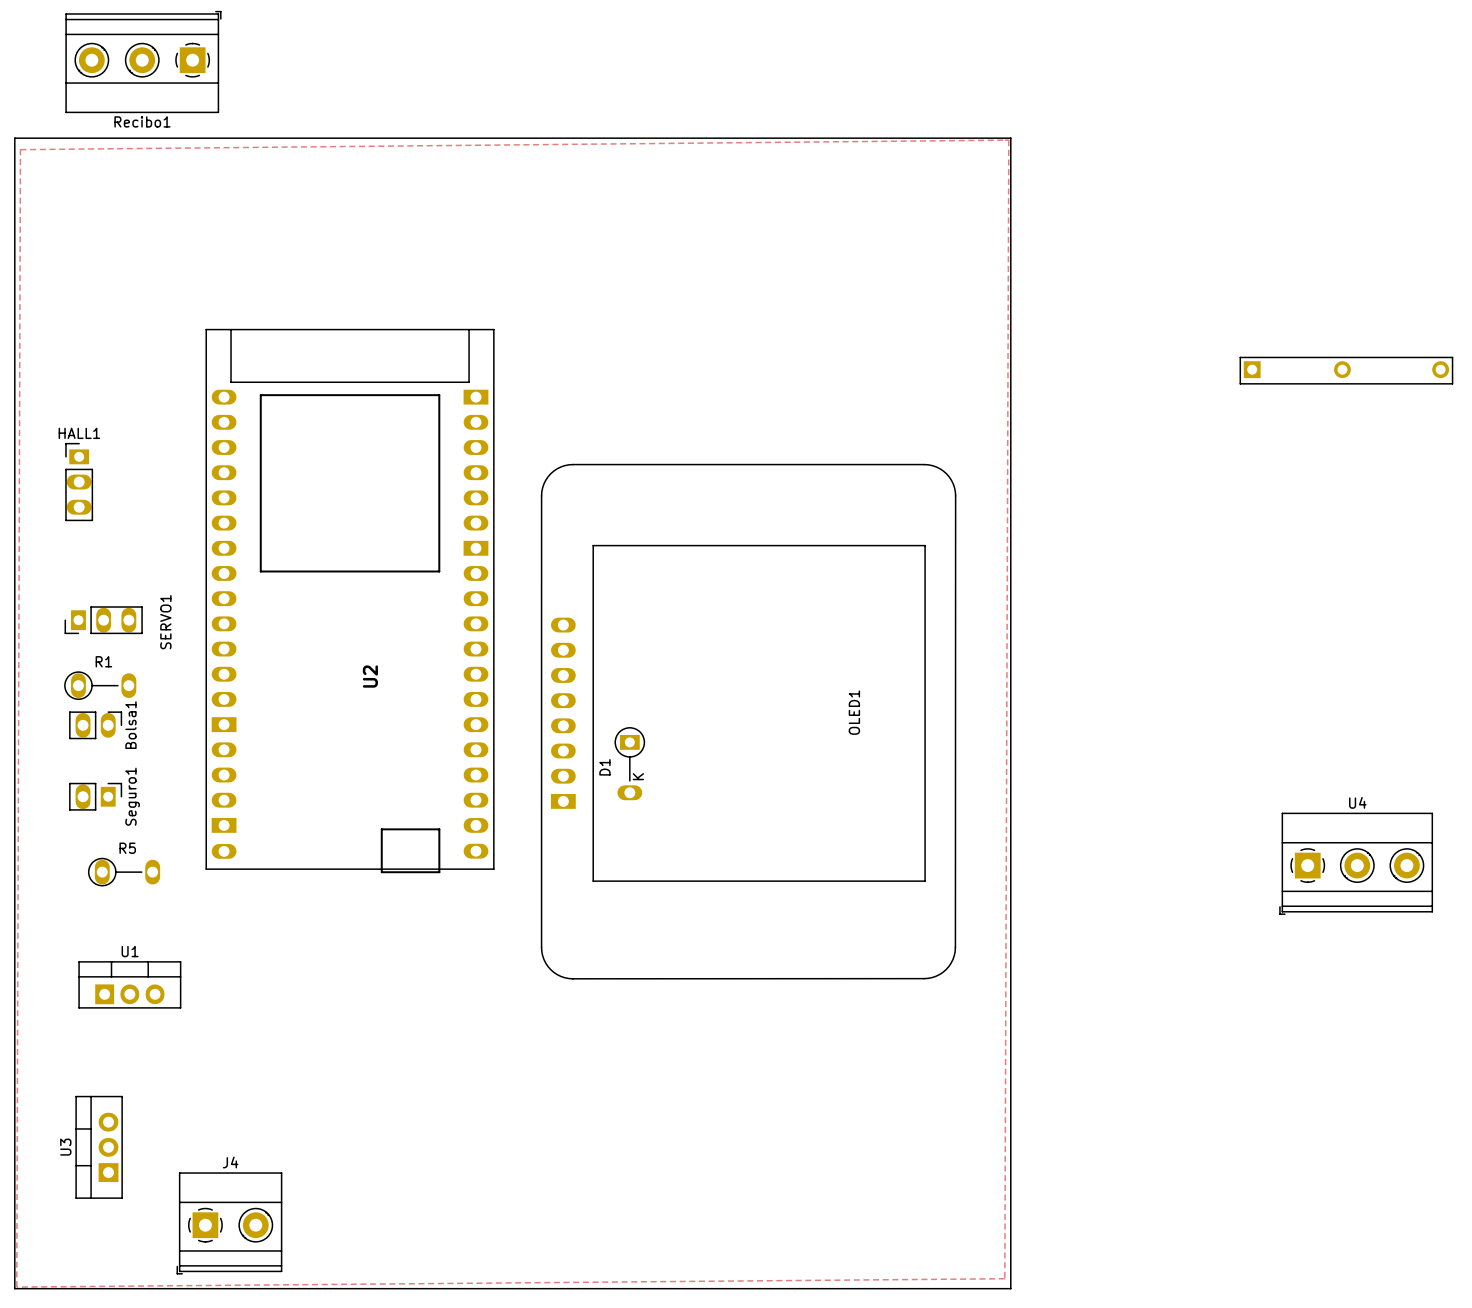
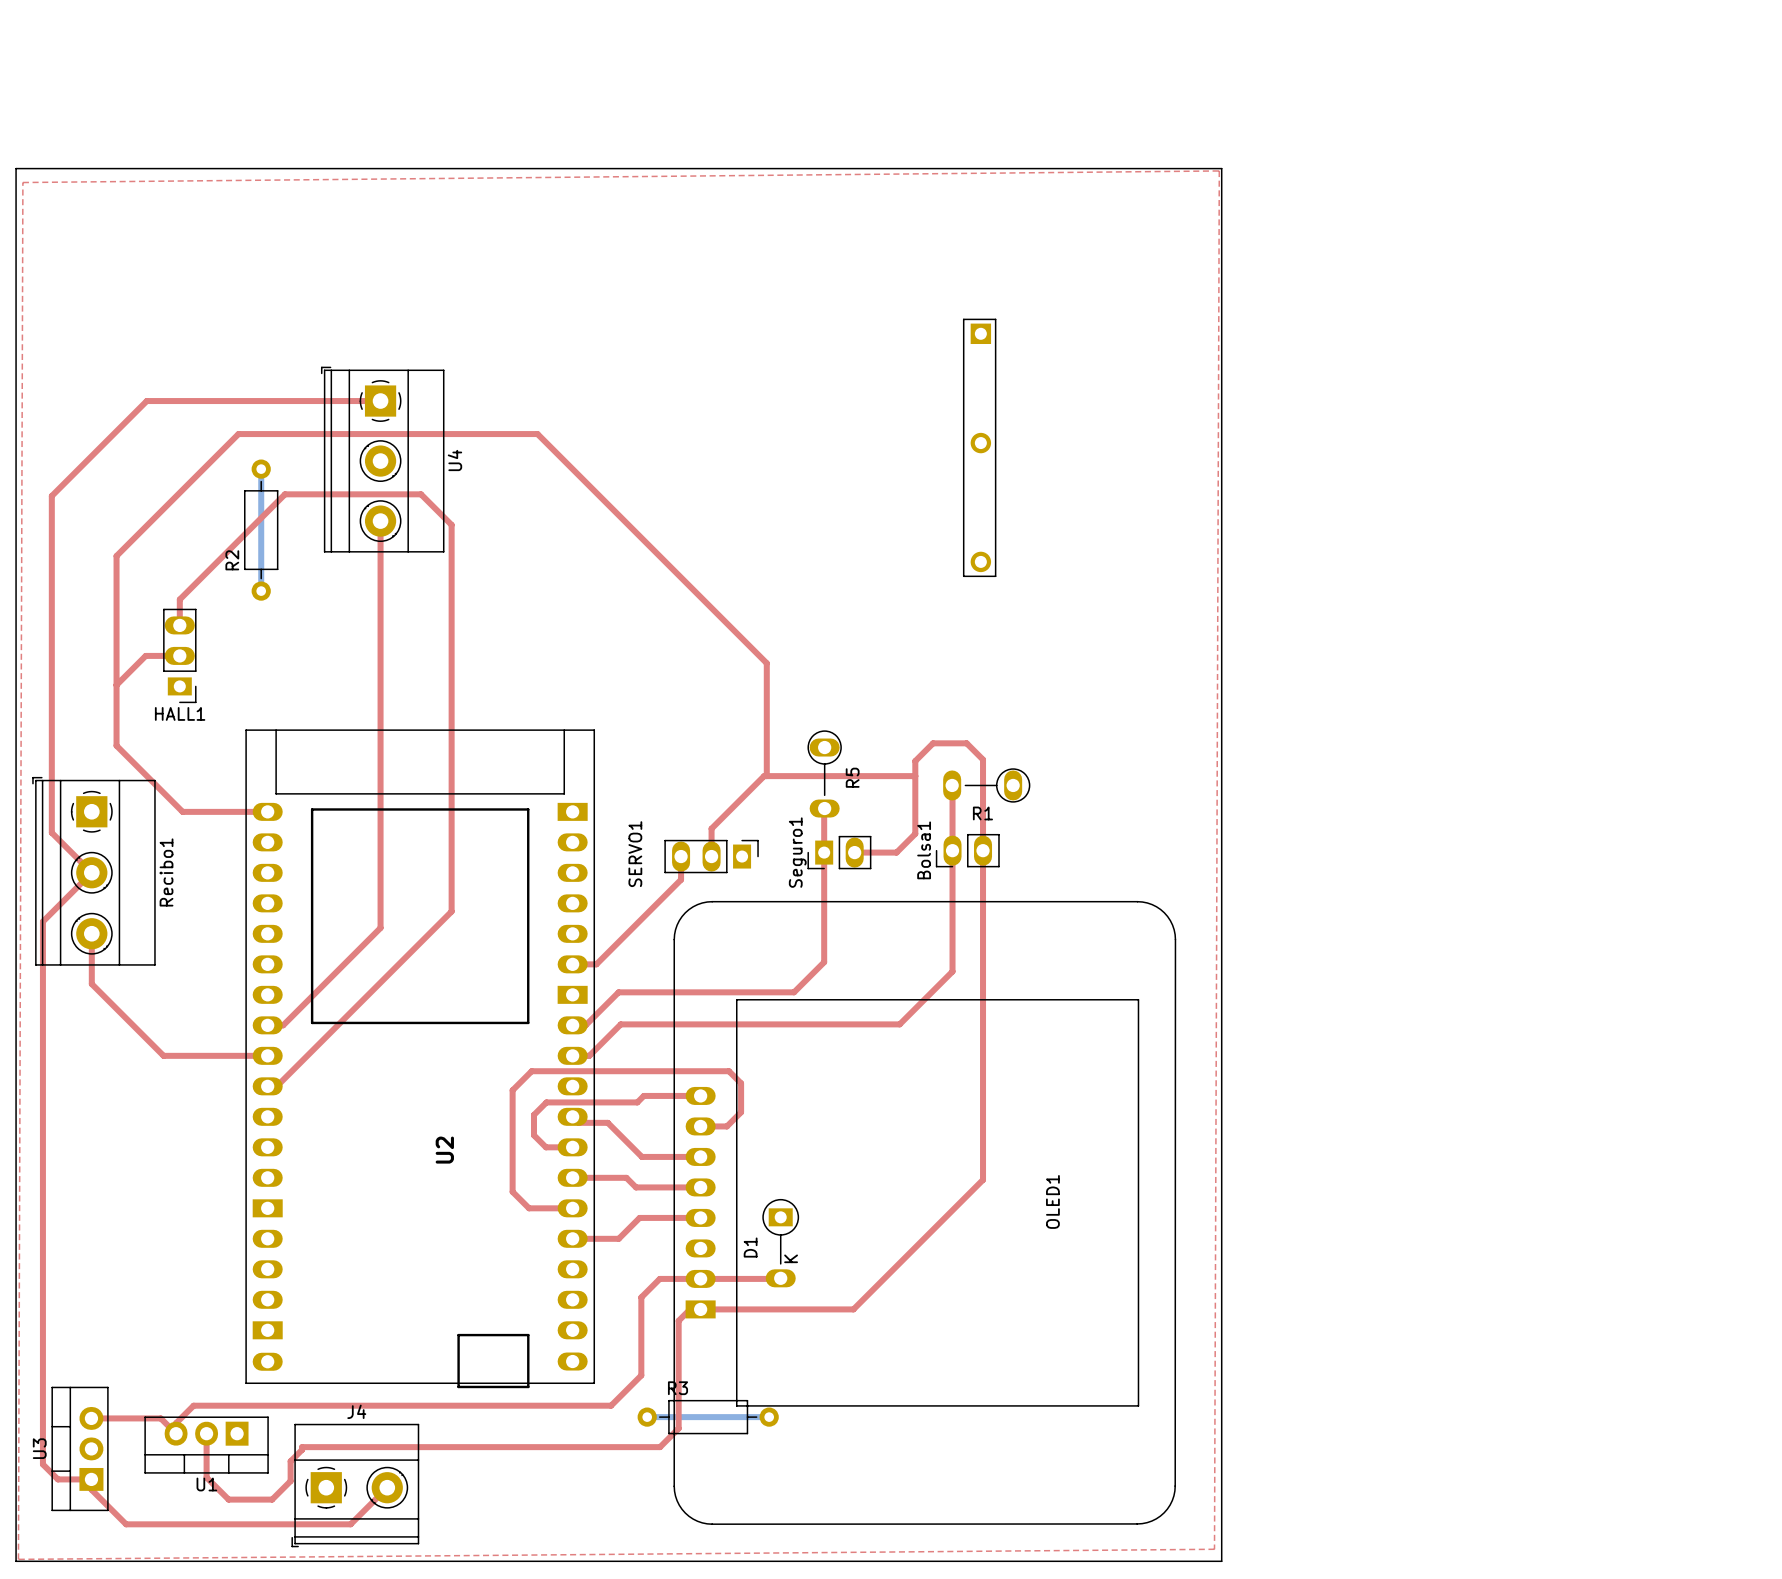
Recibo1 rotation: 0° (143, 62) -> 90° counterclockwise (93, 871)
Recibo1 position: (143, 62) -> (93, 871)
top track: none -> (380, 401) (146, 401) (51, 496) (51, 832) (91, 872) (42, 921) (42, 1464) (57, 1479) (91, 1479) (91, 1489) (126, 1524) (350, 1524) (387, 1487)
bottom track: none -> (261, 469) (261, 591)
top track: none -> (380, 521) (380, 927) (283, 1025) (267, 1025)
R2: none -> (261, 530)
HALL1 rotation: 0° (79, 482) -> 180° (179, 655)
HALL1 position: (79, 482) -> (179, 655)
top track: none -> (179, 625) (179, 599) (284, 494) (421, 494) (451, 524) (451, 911) (276, 1086) (267, 1086)
top track: none -> (179, 655) (145, 655) (116, 685)
U2 position: (350, 601) -> (420, 1058)
SERVO1 rotation: 0° (103, 620) -> 180° (711, 856)
SERVO1 position: (103, 620) -> (711, 856)
U4 rotation: 0° (1346, 635) -> 90° clockwise (658, 447)
U4 position: (1346, 635) -> (658, 447)
top track: none -> (766, 776) (766, 663) (537, 434) (238, 434) (116, 556) (116, 745) (182, 811) (267, 811)
top track: none -> (915, 776) (764, 776) (711, 828) (711, 856)
top track: none -> (952, 785) (952, 971) (899, 1024) (620, 1024) (589, 1055) (572, 1055)
top track: none -> (824, 808) (824, 962) (794, 992) (618, 992) (585, 1025) (572, 1025)
R1 rotation: 0° (100, 685) -> 180° (986, 785)
R1 position: (100, 685) -> (986, 785)
top track: none -> (854, 852) (896, 852) (915, 833) (915, 761) (933, 743) (966, 743) (983, 759) (983, 1179) (853, 1309) (690, 1309) (678, 1320) (678, 1428) (660, 1447) (302, 1447) (302, 1449) (290, 1461) (290, 1481) (272, 1499) (228, 1499) (206, 1477) (206, 1433)
top track: none -> (681, 856) (681, 879) (596, 964) (572, 964)
OLED1 position: (748, 721) -> (924, 1212)
Bolsa1 rotation: 0° (95, 725) -> 180° (967, 850)
Bolsa1 position: (95, 725) -> (967, 850)
D1 position: (629, 763) -> (780, 1243)
top track: none -> (91, 933) (91, 984) (163, 1055) (267, 1055)
Seguro1 rotation: 0° (95, 796) -> 180° (839, 852)
Seguro1 position: (95, 796) -> (839, 852)
R5 rotation: 0° (124, 872) -> 90° clockwise (824, 773)
R5 position: (124, 872) -> (824, 773)
top track: none -> (695, 1100) (700, 1095) (643, 1095) (637, 1102) (546, 1102) (533, 1114) (533, 1135) (546, 1147) (572, 1147)
top track: none -> (572, 1116) (578, 1122) (607, 1122) (641, 1156) (700, 1156)
top track: none -> (700, 1126) (726, 1126) (741, 1112) (741, 1083) (728, 1071) (531, 1071) (512, 1090) (512, 1191) (529, 1208) (572, 1208)
top track: none -> (572, 1177) (626, 1177) (636, 1187) (700, 1187)
U1 rotation: 0° (129, 984) -> 180° (206, 1445)
U1 position: (129, 984) -> (206, 1445)
top track: none -> (700, 1217) (639, 1217) (618, 1238) (572, 1238)
top track: none -> (780, 1278) (659, 1278) (641, 1297) (641, 1375) (611, 1405) (193, 1405) (176, 1423) (176, 1433) (160, 1418) (91, 1418)
U3 position: (99, 1147) -> (80, 1448)
bottom track: none -> (647, 1417) (769, 1417)
R3: none -> (708, 1417)
J4 position: (229, 1223) -> (355, 1485)

